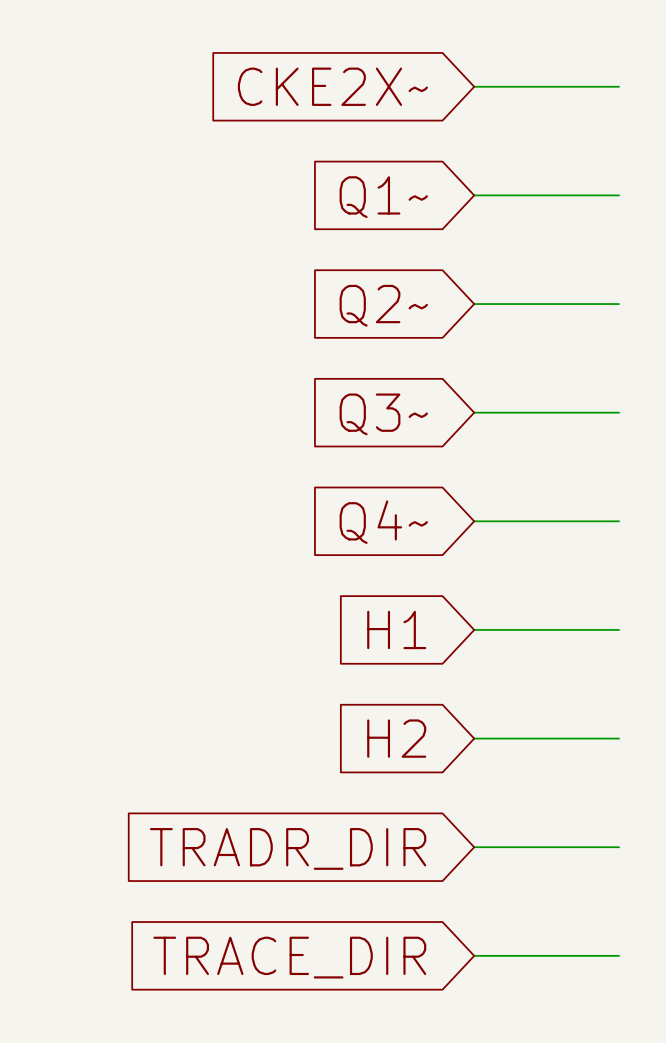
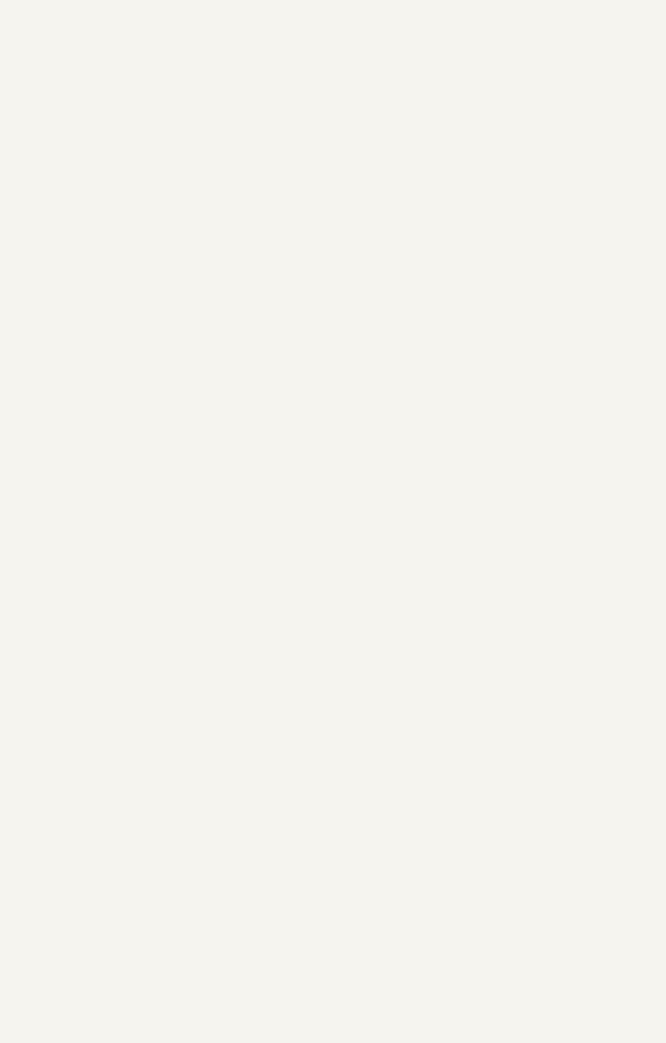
global label: CKE2X~ (332, 86) -> none
wire: (474, 86) (619, 86) -> none
wire: (474, 195) (619, 195) -> none
global label: Q1~ (383, 197) -> none
wire: (474, 304) (619, 304) -> none
global label: Q2~ (383, 305) -> none
wire: (474, 412) (619, 412) -> none
global label: Q3~ (383, 414) -> none
wire: (474, 521) (619, 521) -> none
global label: Q4~ (383, 522) -> none
global label: H1 (396, 629) -> none
wire: (474, 629) (619, 629) -> none
global label: H2 (396, 738) -> none
wire: (474, 738) (619, 738) -> none
wire: (474, 847) (619, 847) -> none
global label: TRADR_DIR (288, 848) -> none
wire: (474, 955) (619, 955) -> none
global label: TRACE_DIR (289, 957) -> none

